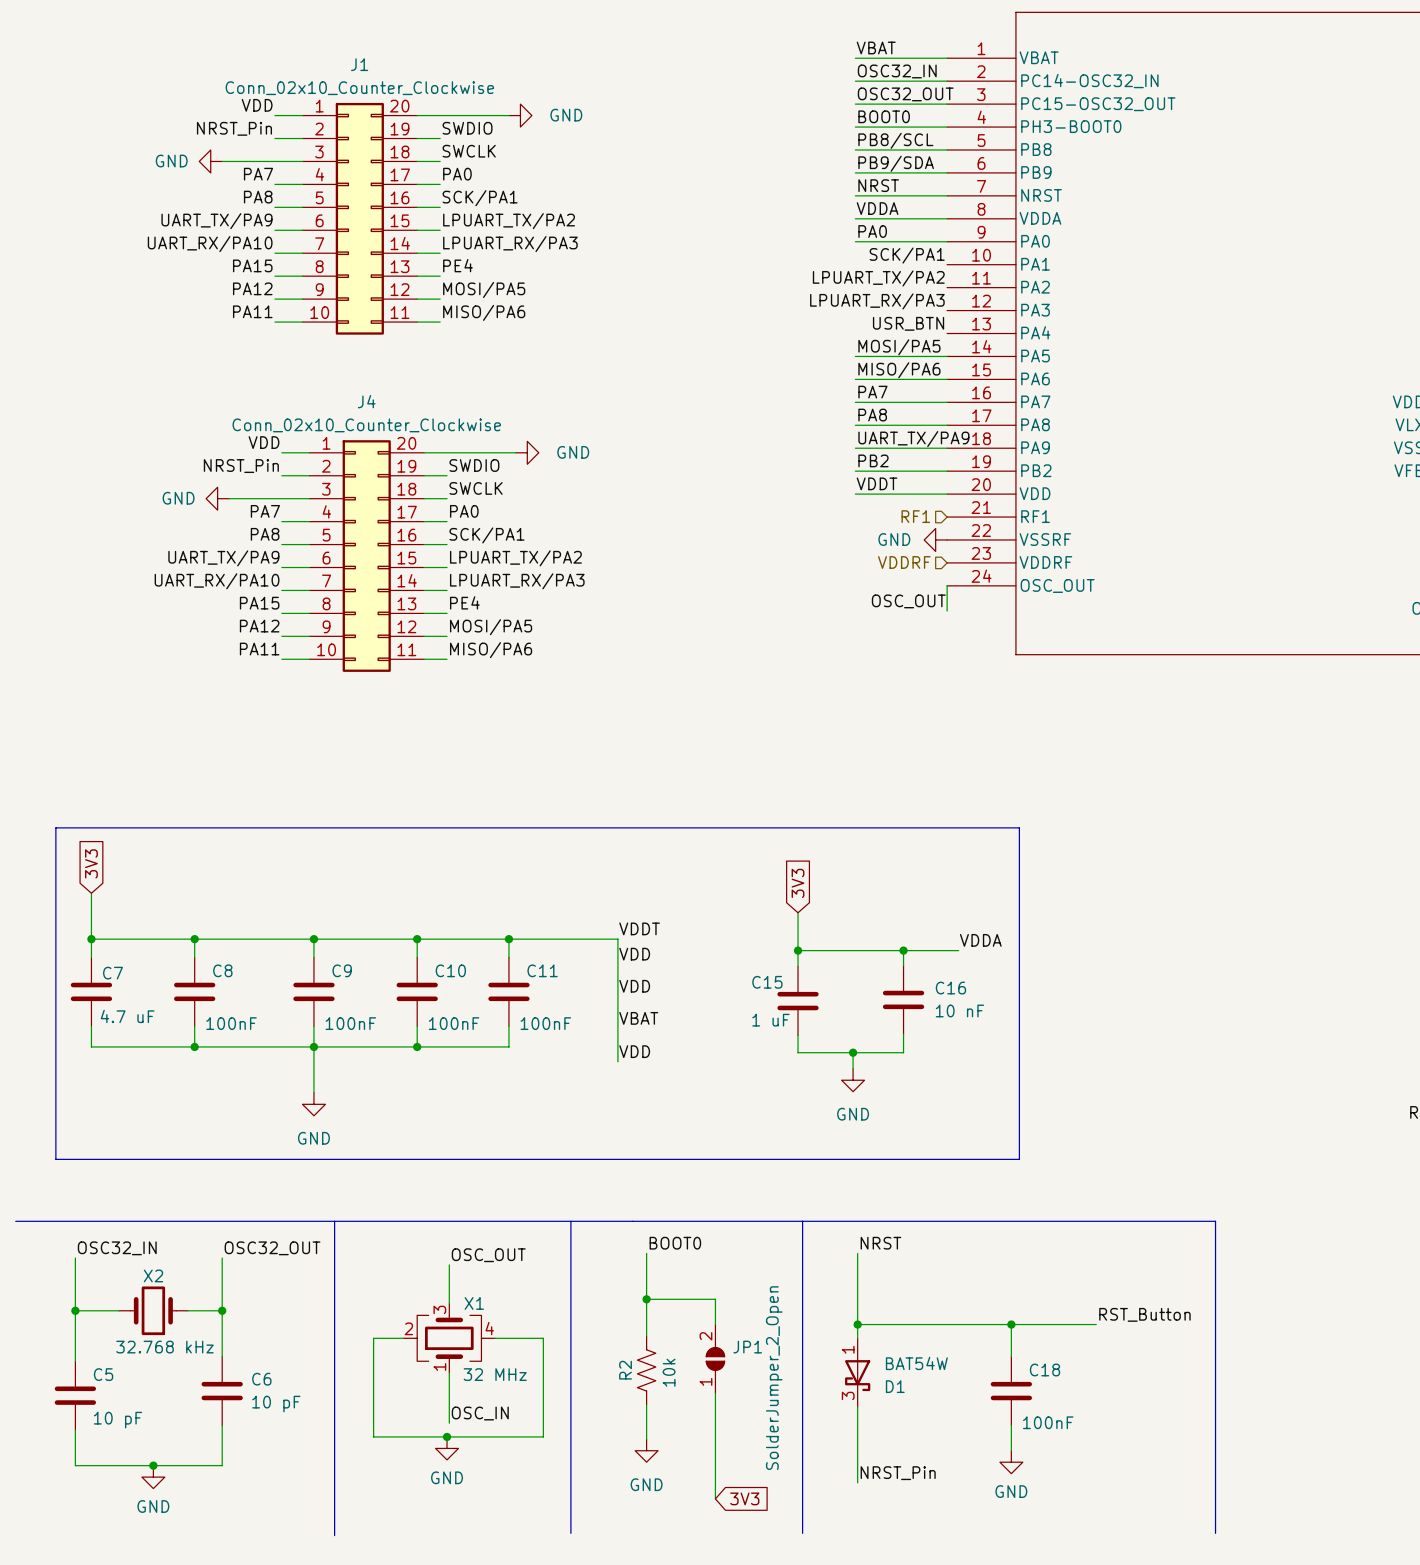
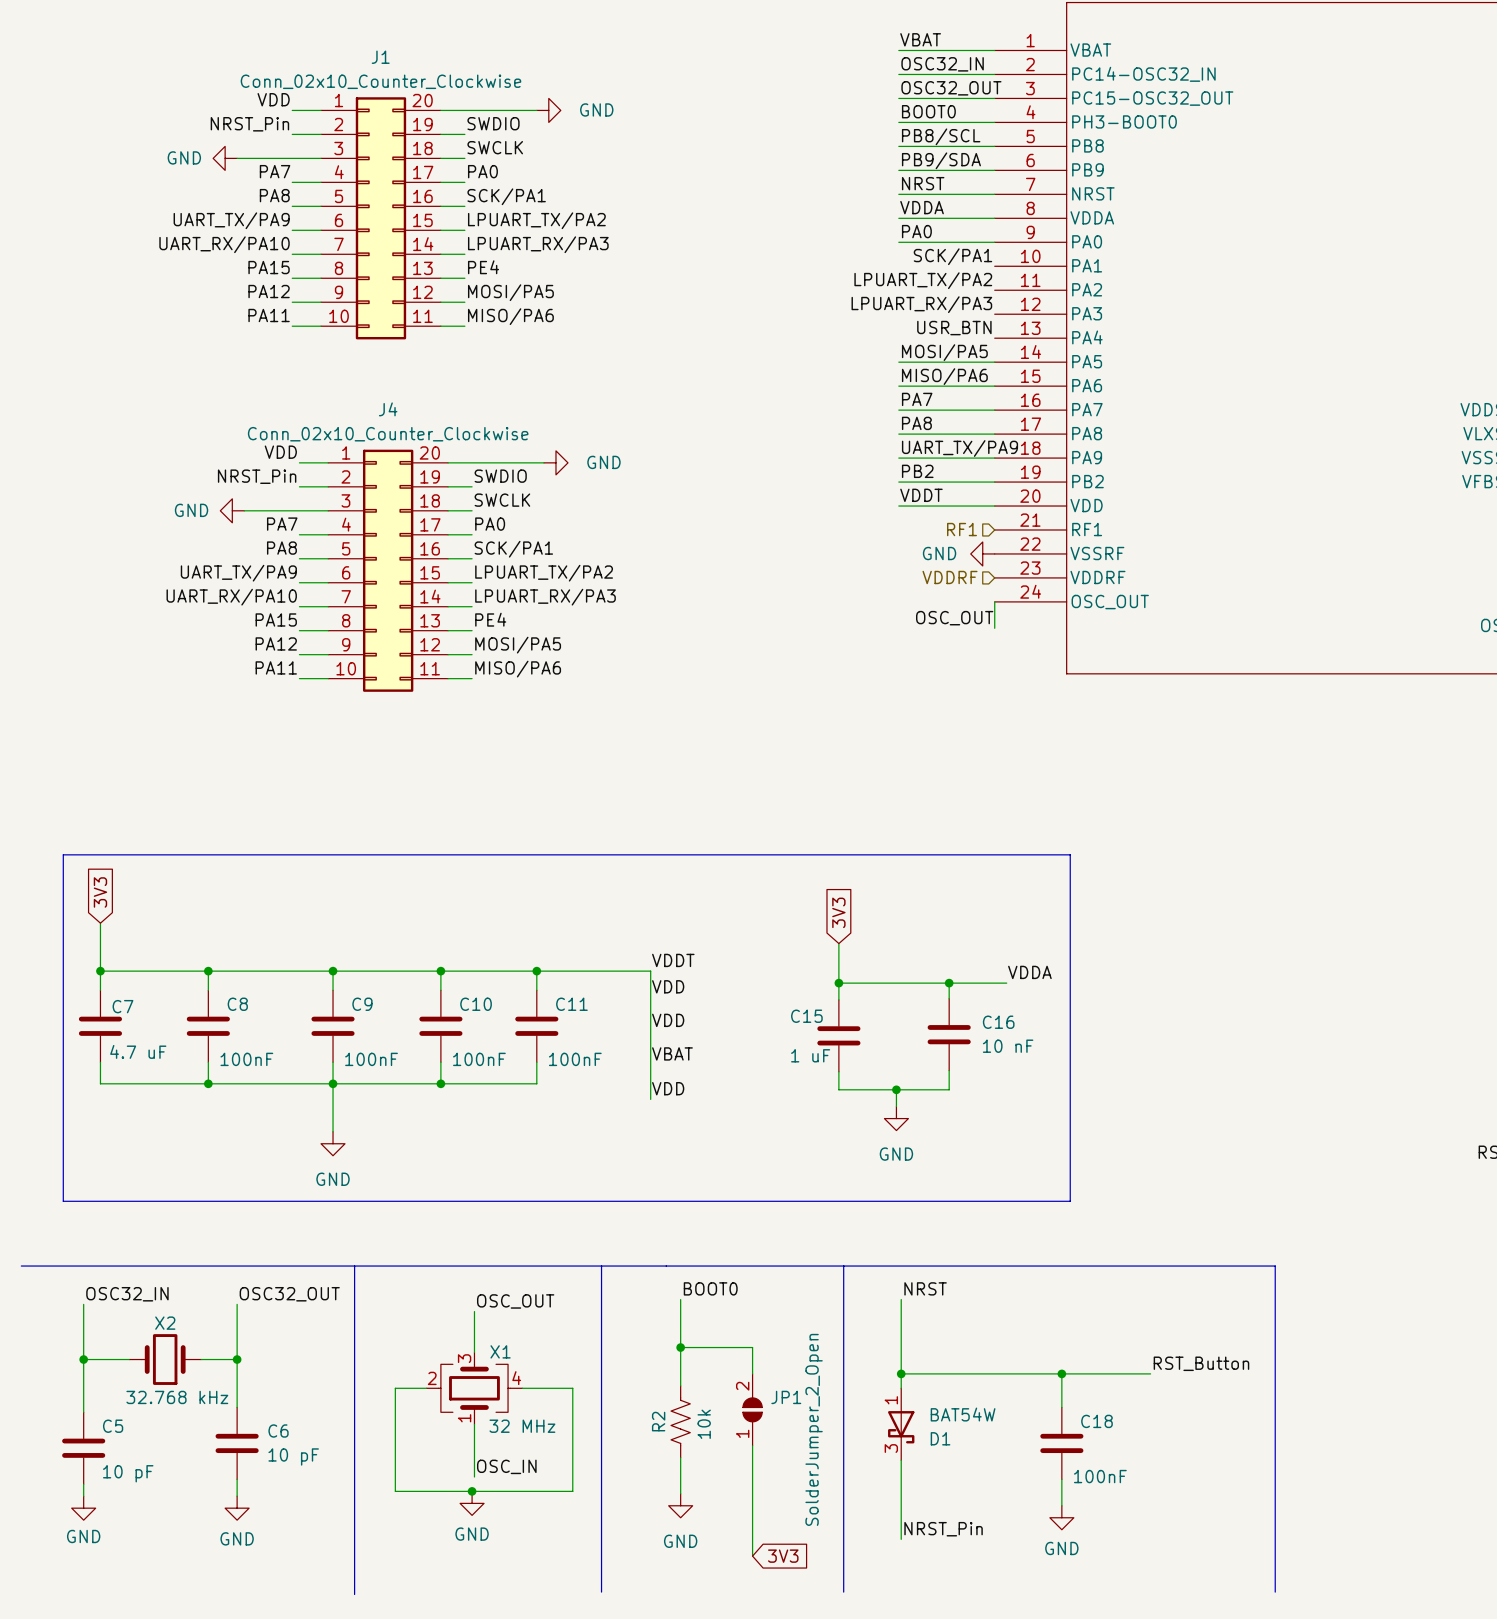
wire: (75, 1441) (75, 1465) (222, 1465) (222, 1441) -> none
power symbol: none -> GND (83, 1508)
power symbol: none -> GND (237, 1508)
junction: (153, 1465) -> none
power symbol: GND (153, 1477) -> none

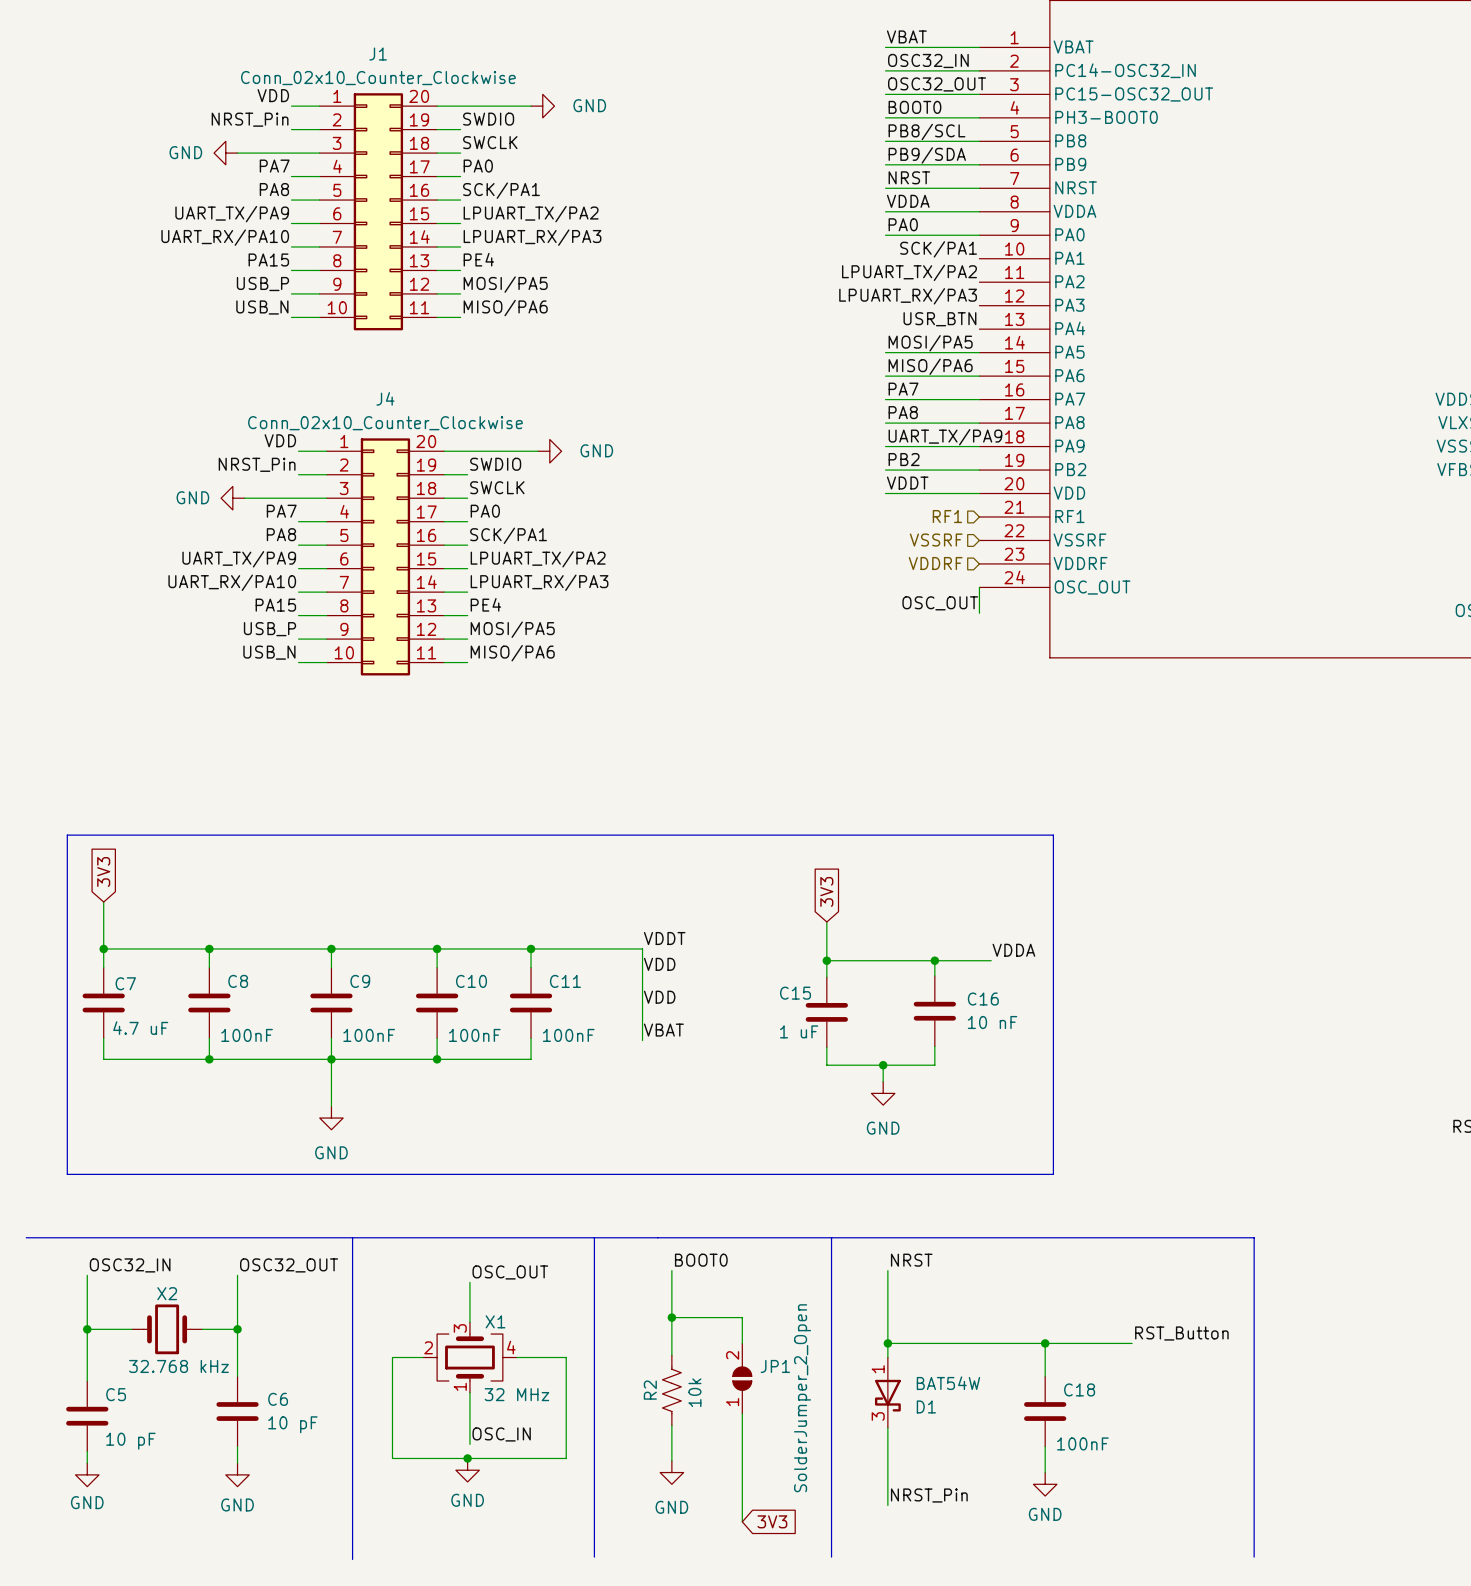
label: PA12 (269, 291) -> USB_P (262, 284)
label: PA11 (269, 315) -> USB_N (262, 307)
hierarchical label: none -> VSSRF (936, 540)
power symbol: GND (982, 553) -> none
label: PA12 (276, 643) -> USB_P (269, 629)
label: PA11 (276, 667) -> USB_N (269, 652)
wire: (650, 1064) (650, 1099) -> none
label: VDD (668, 1088) -> none

